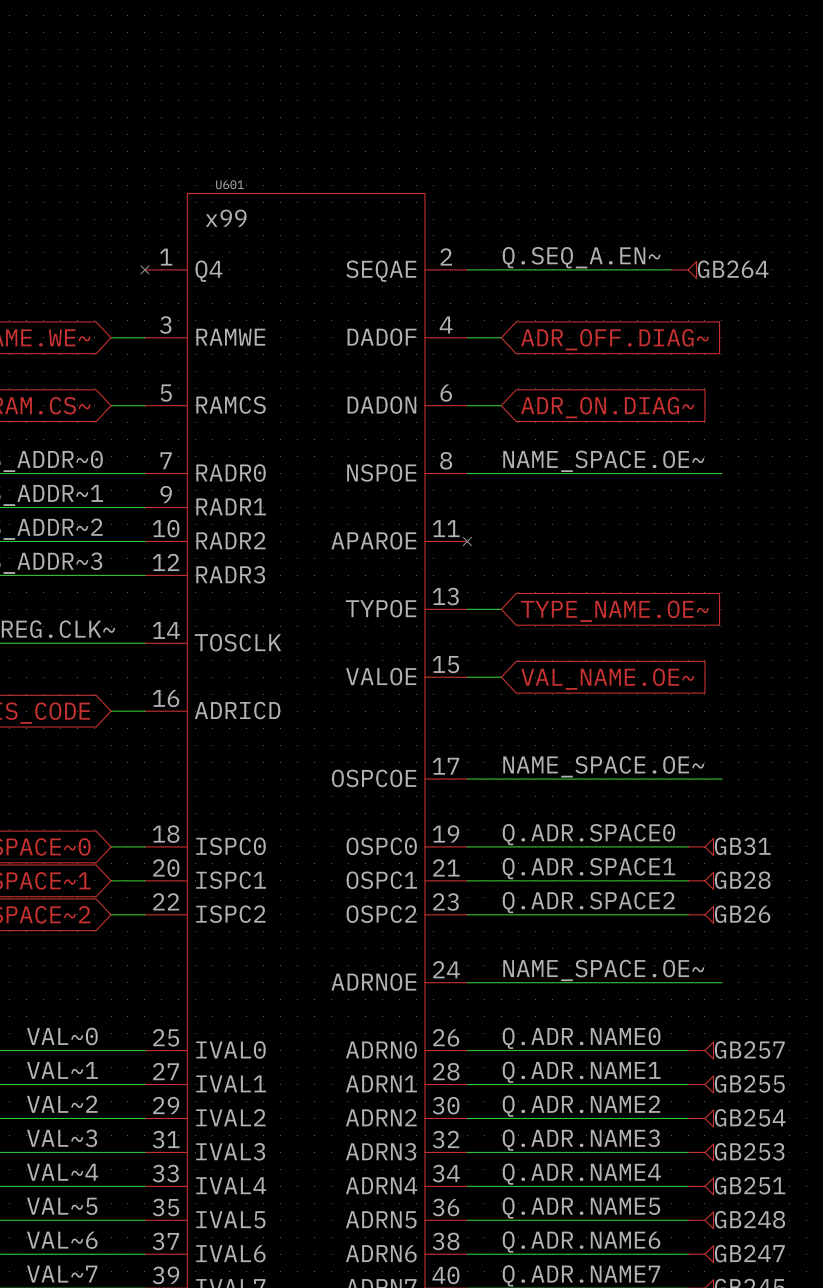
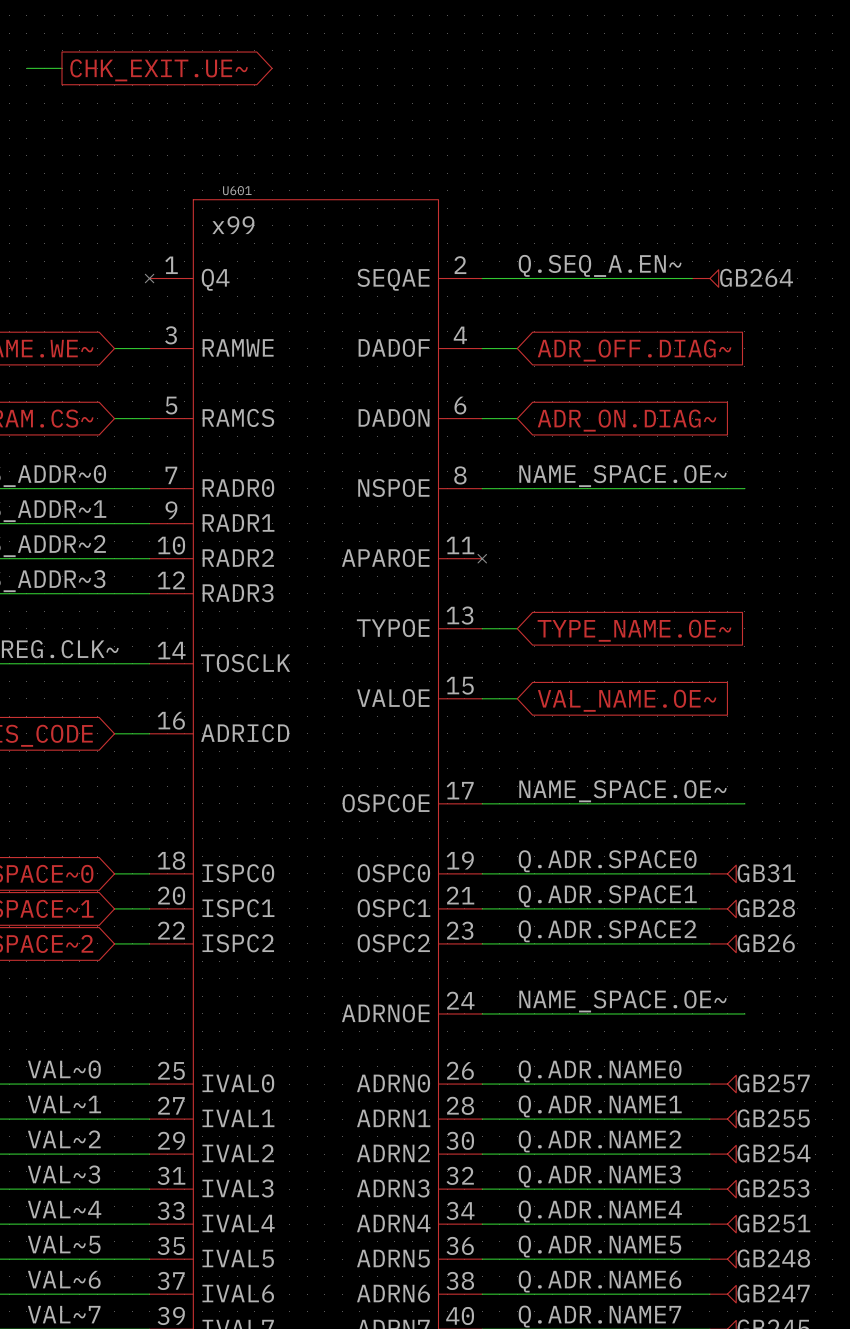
wire: none -> (26, 68) (62, 68)
global label: none -> CHK_EXIT.UE~ (159, 70)

